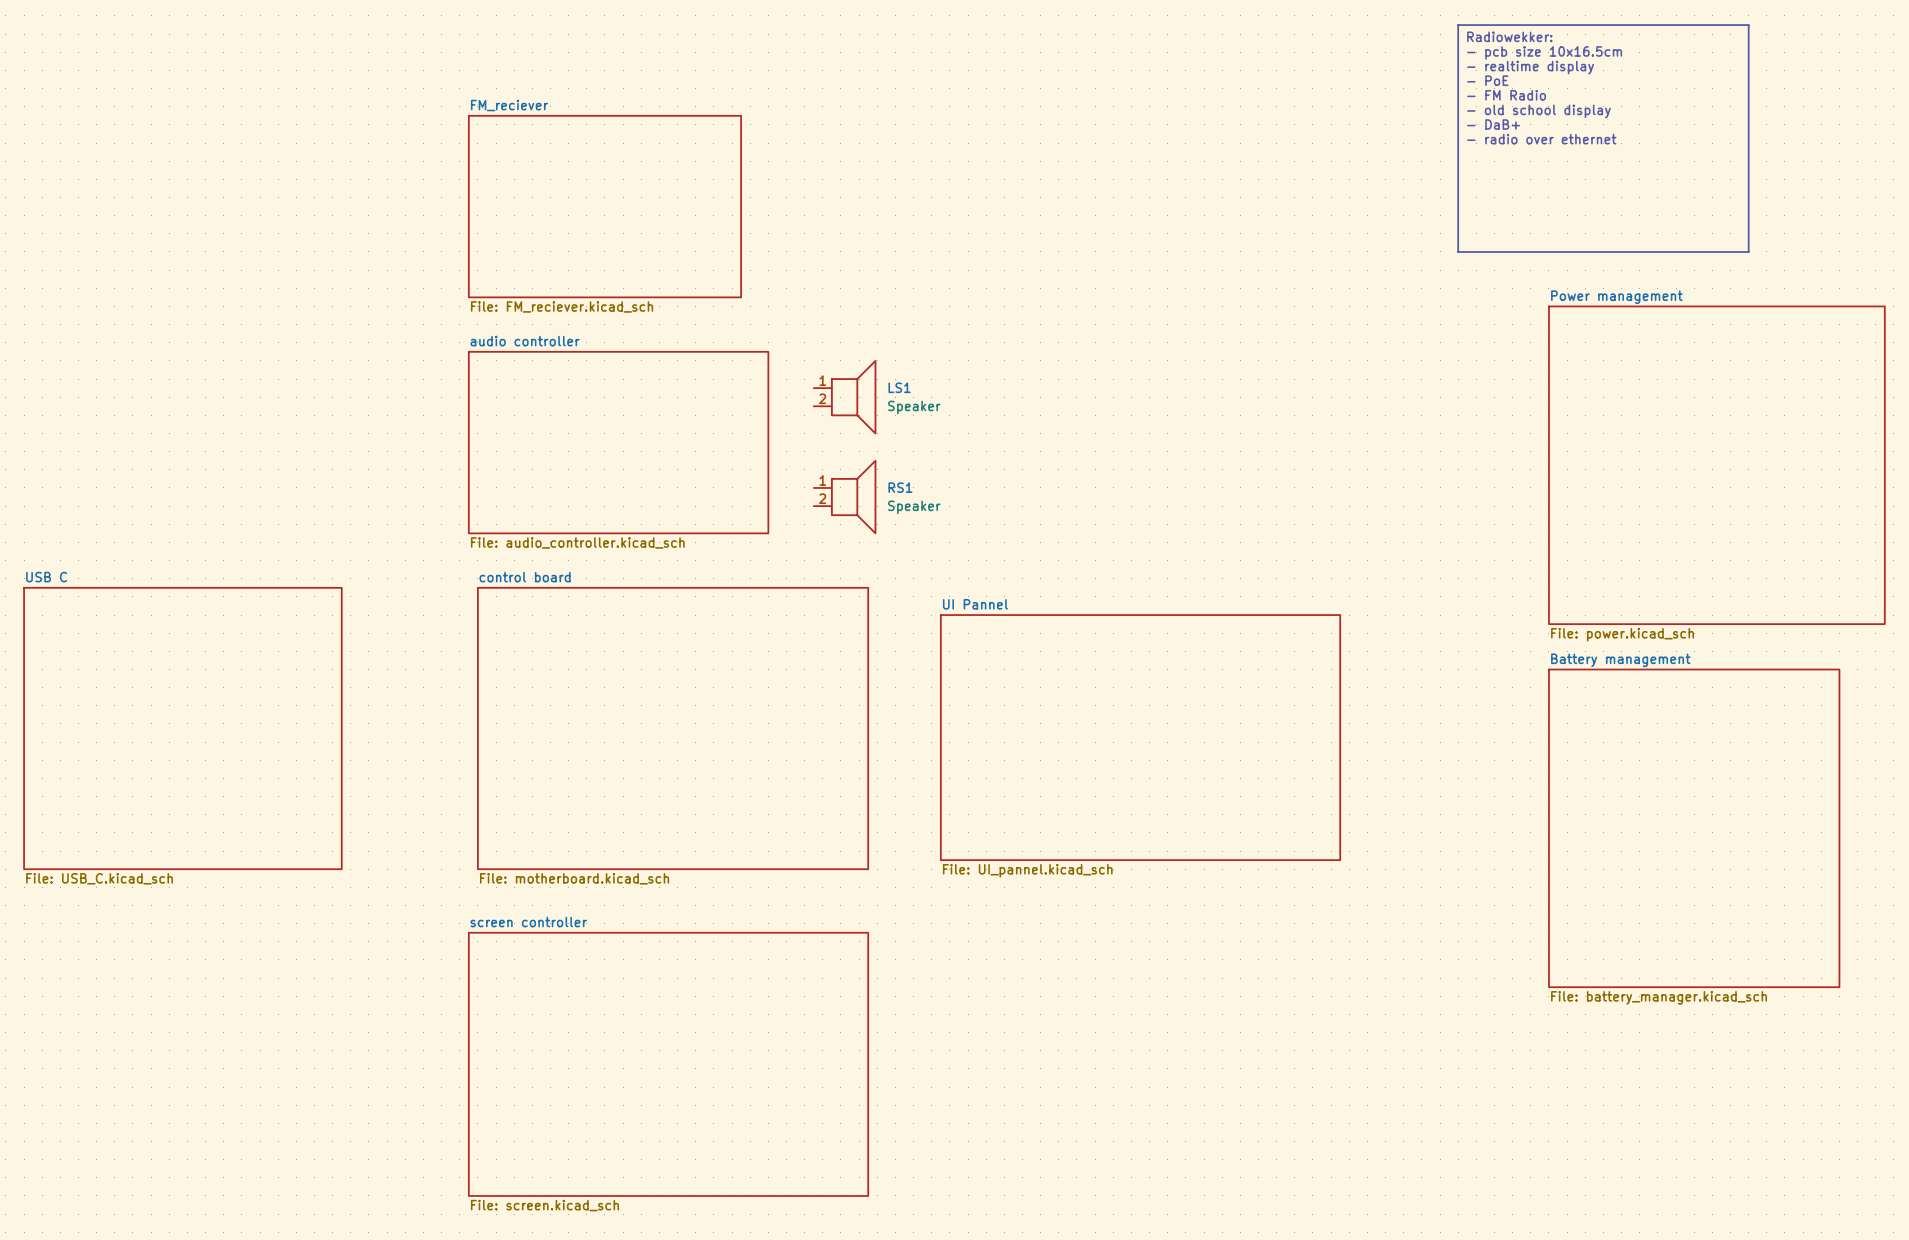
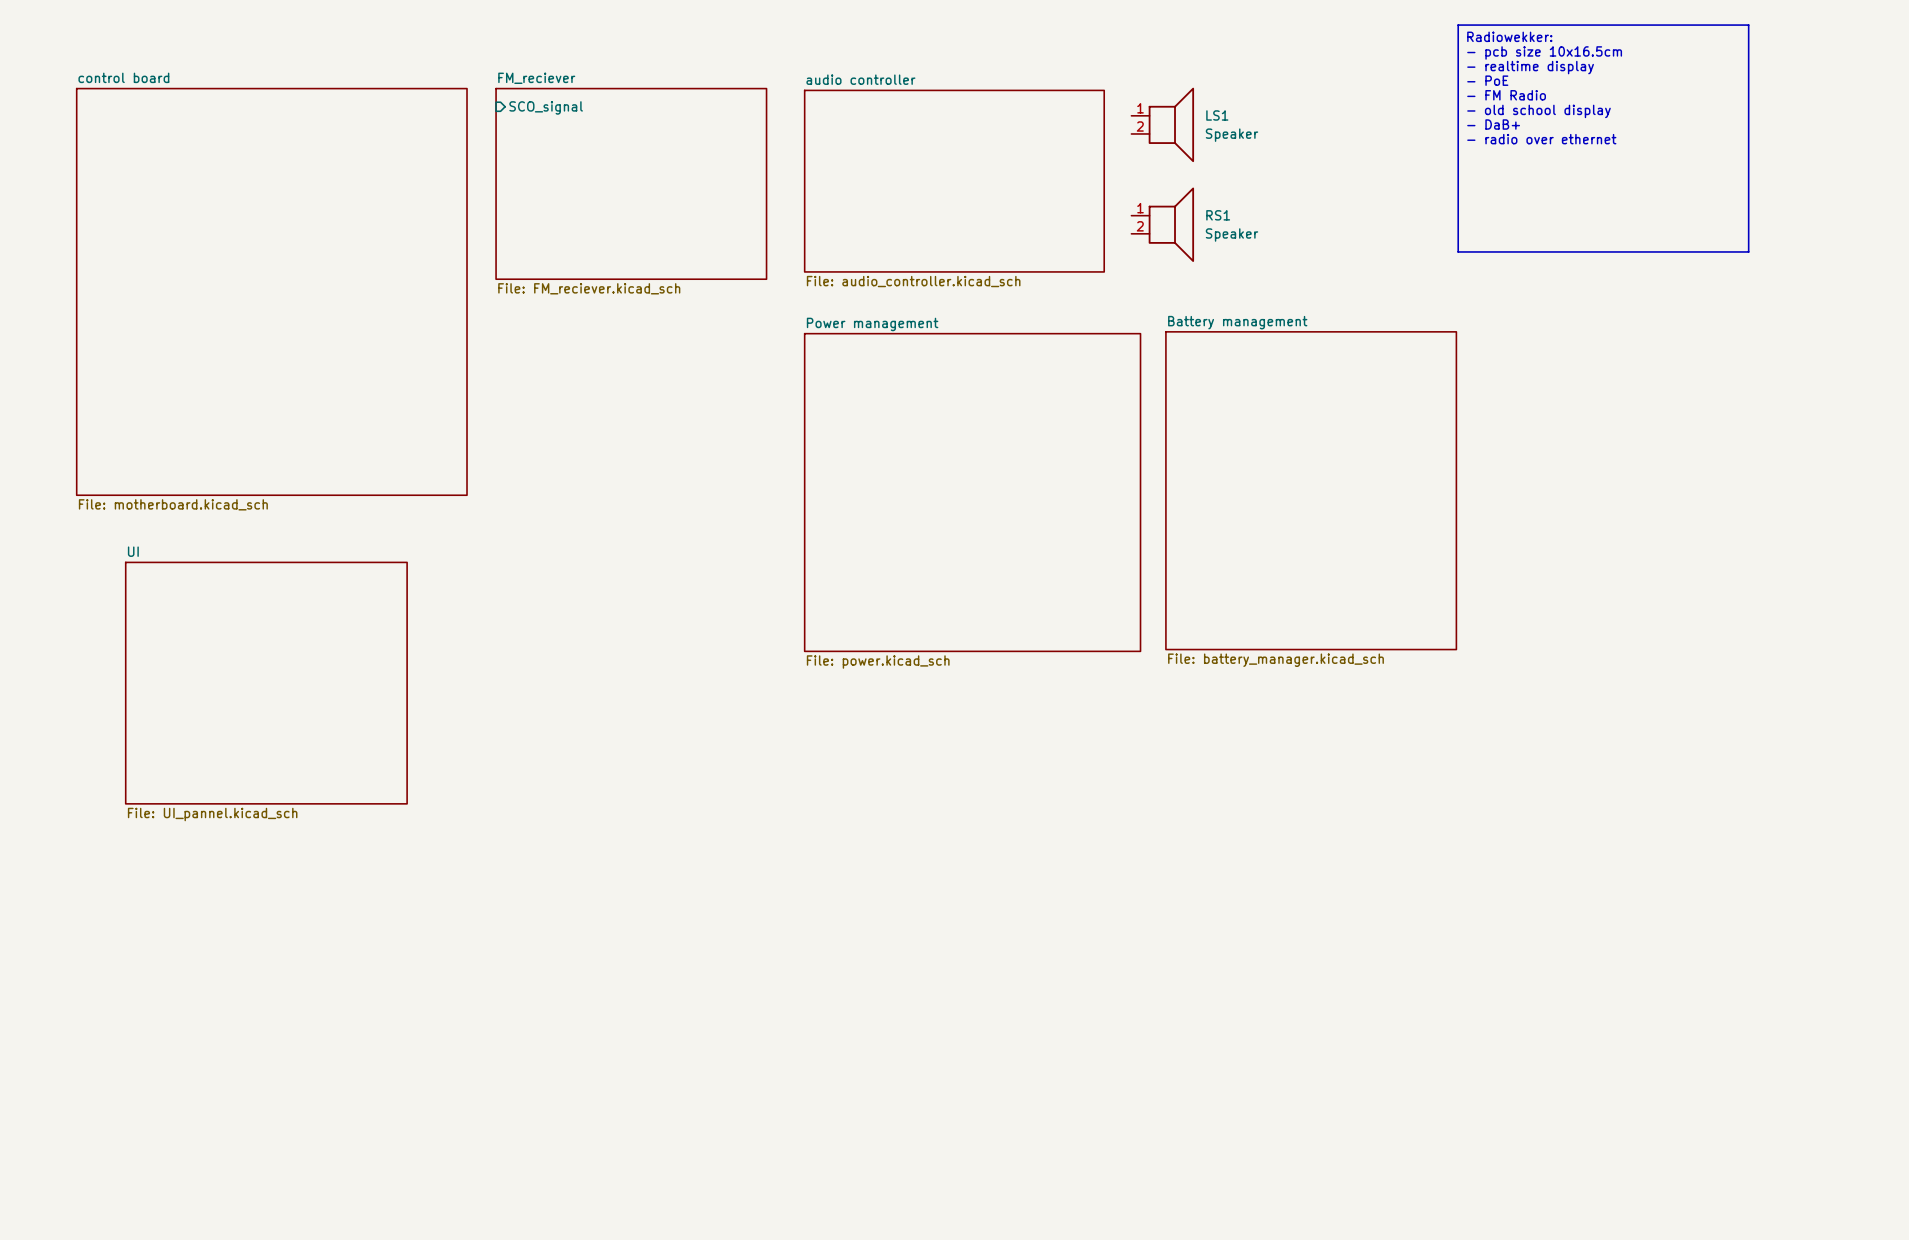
sheet pin: none -> SCO_signal (546, 107)
sheet audio controller: none -> File: audio_controller.kicad_sch (954, 181)
sheet FM_reciever: none -> File: FM_reciever.kicad_sch (631, 183)
sheet FM_reciever: File: FM_reciever.kicad_sch (604, 206) -> none
sheet control board: none -> File: motherboard.kicad_sch (271, 291)
LS1 position: (845, 397) -> (1162, 124)
sheet audio controller: File: audio_controller.kicad_sch (618, 442) -> none
sheet Power management: File: power.kicad_sch (1716, 465) -> none
sheet Battery management: none -> File: battery_manager.kicad_sch (1311, 490)
sheet Power management: none -> File: power.kicad_sch (972, 492)
RS1 position: (845, 497) -> (1162, 224)
sheet UI: none -> File: UI_pannel.kicad_sch (266, 683)
sheet USB C: File: USB_C.kicad_sch (182, 728) -> none
sheet control board: File: motherboard.kicad_sch (673, 728) -> none
sheet UI Pannel: File: UI_pannel.kicad_sch (1140, 737) -> none
sheet Battery management: File: battery_manager.kicad_sch (1694, 828) -> none
sheet screen controller: File: screen.kicad_sch (668, 1064) -> none

